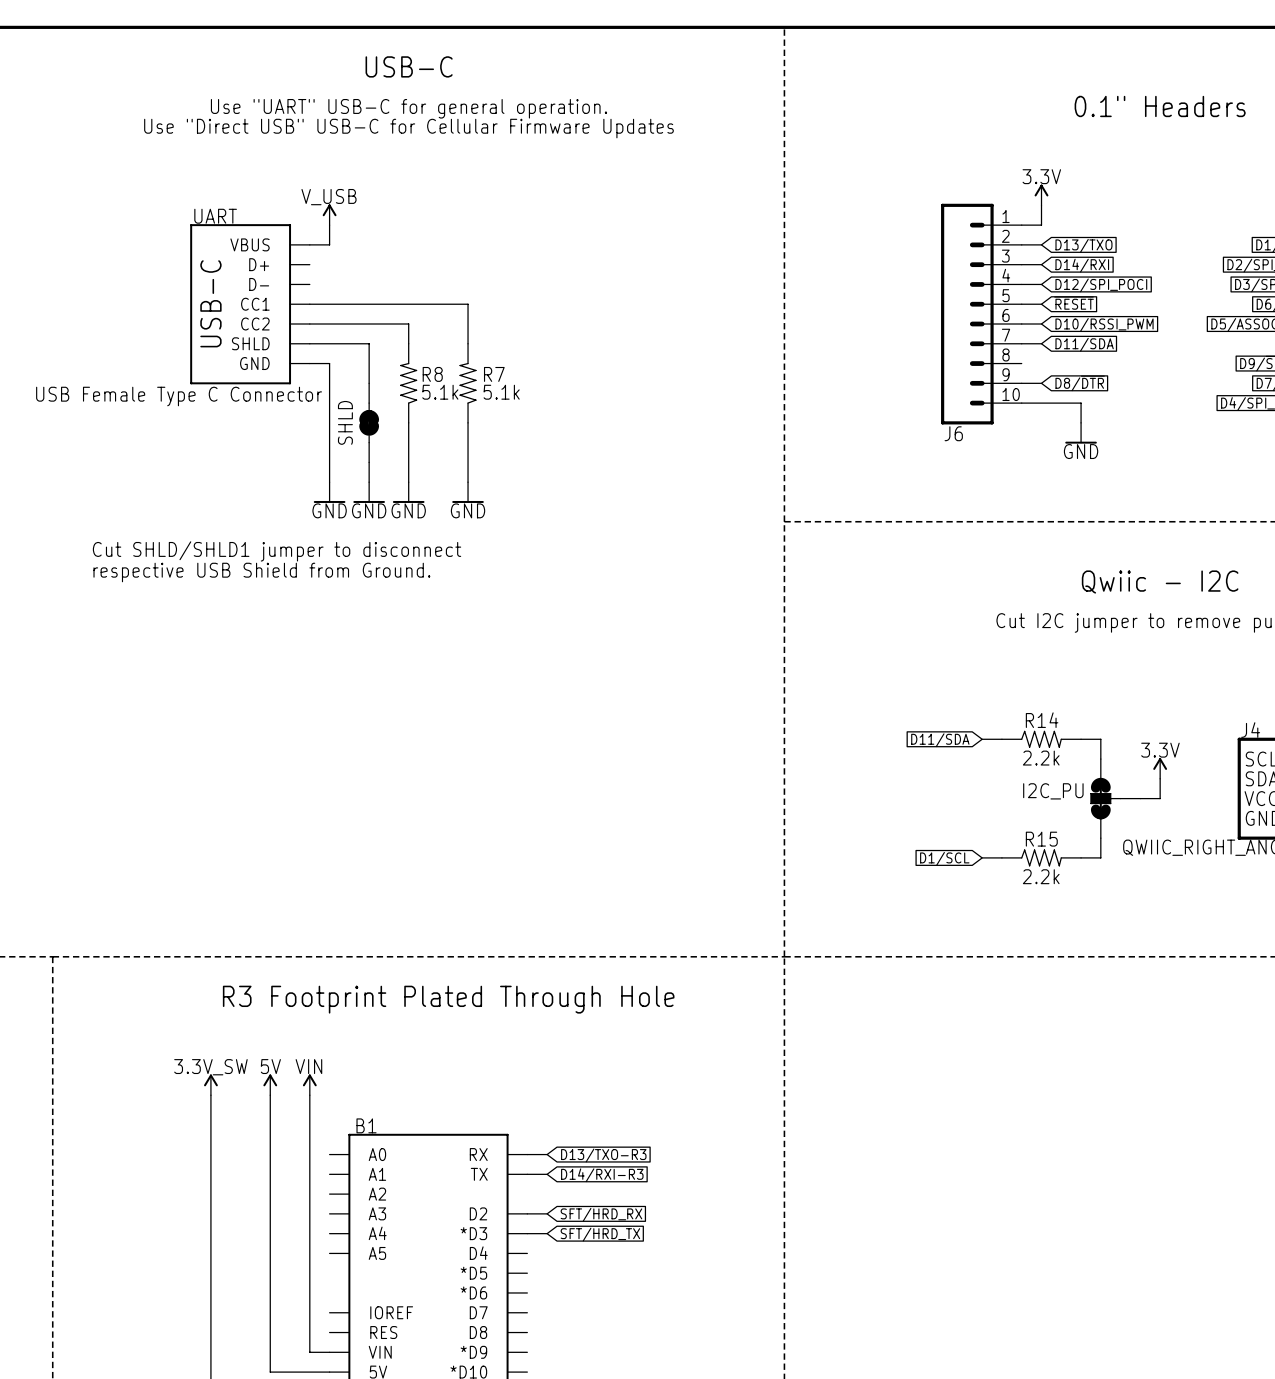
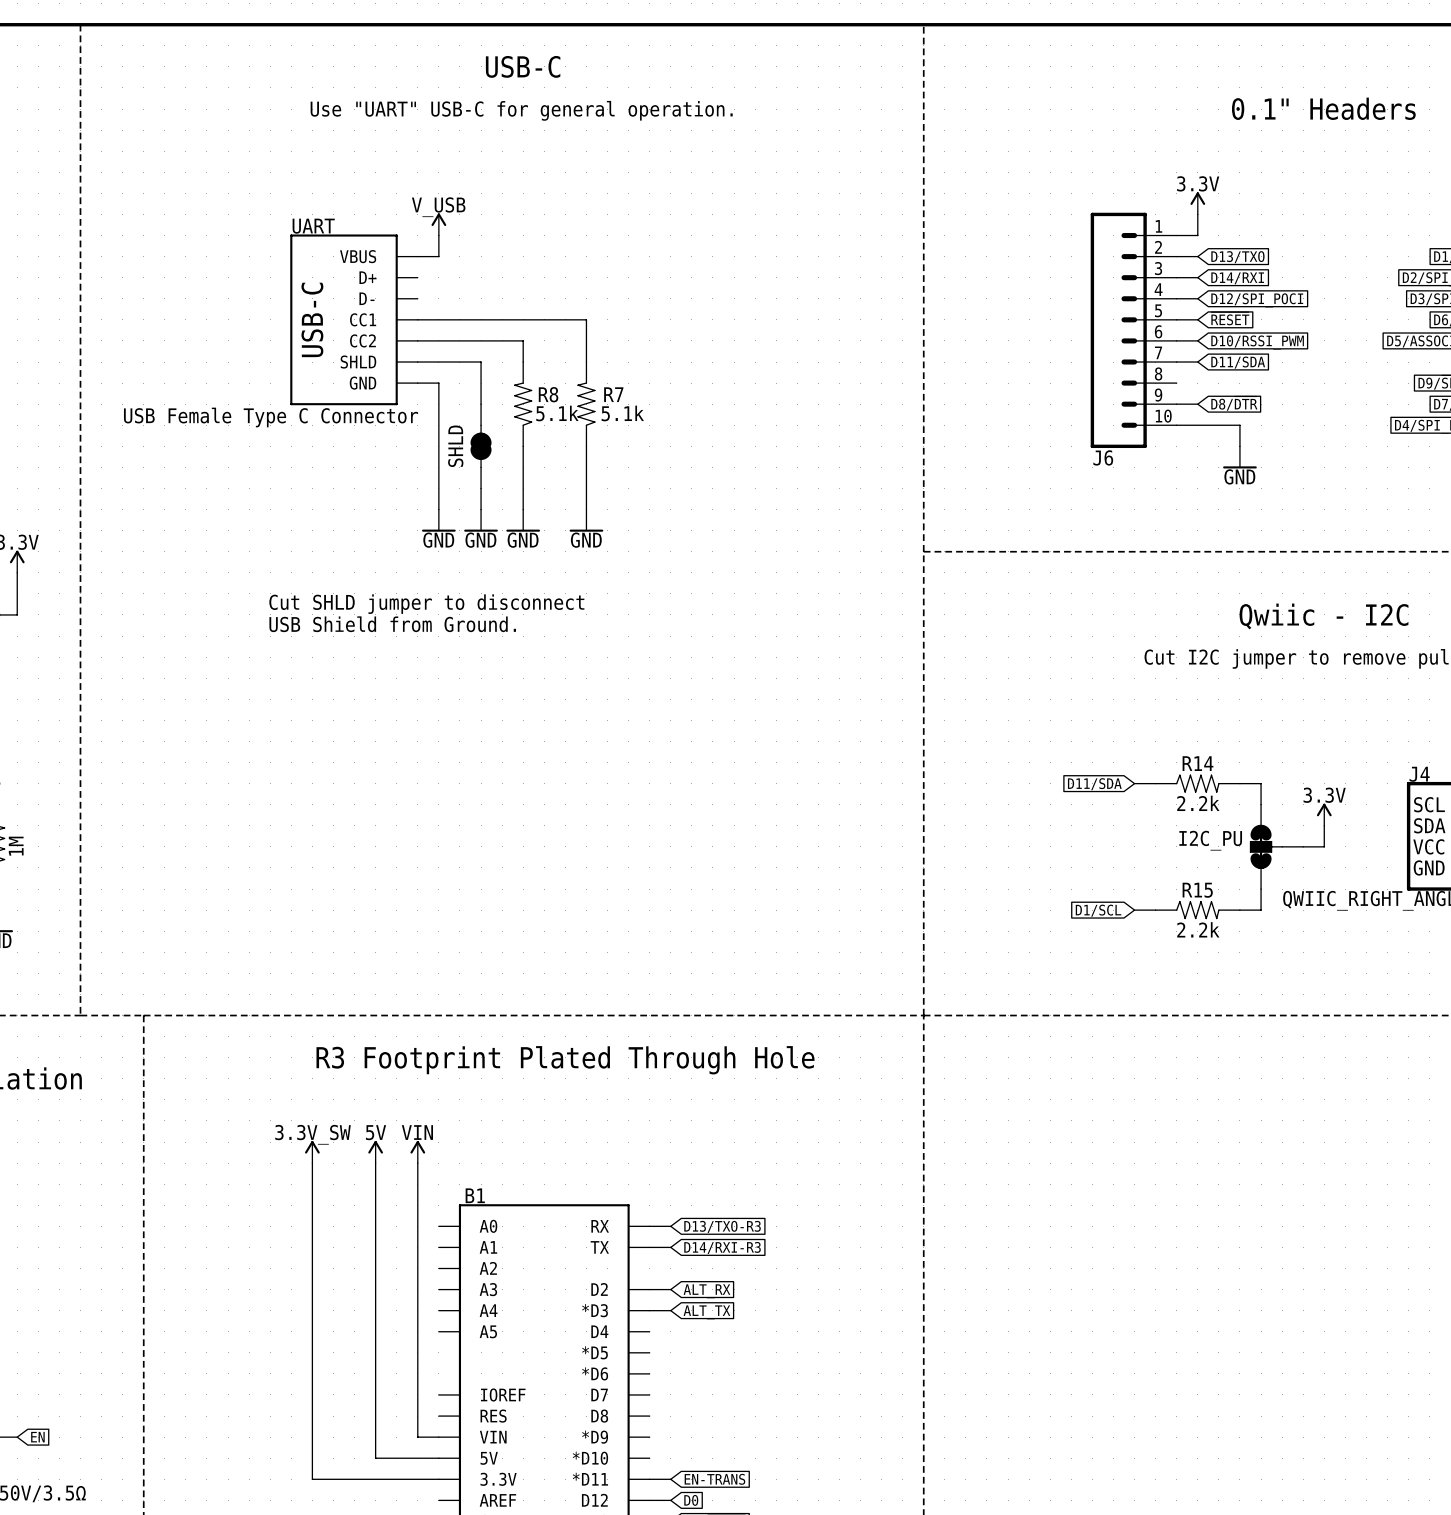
text: Use "Direct USB" USB-C for Cellular Firmware Updates (408, 128) -> none
text: Cut SHLD/SHLD1 jumper to disconnect (277, 551) -> Cut SHLD jumper to disconnect (426, 604)
text: respective USB Shield from Ground. (261, 572) -> USB Shield from Ground. (392, 624)
global label: SFT/HRD_RX (601, 1214) -> ALT_RX (706, 1291)
global label: SFT/HRD_TX (600, 1234) -> ALT_TX (706, 1312)

